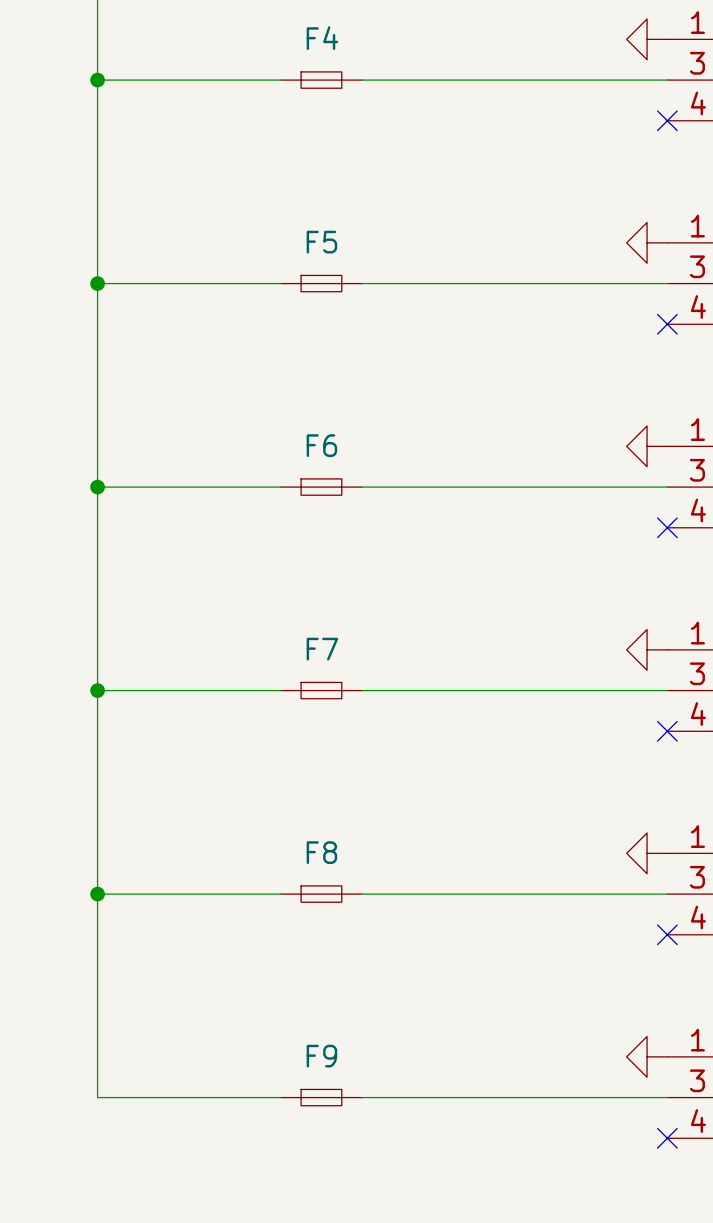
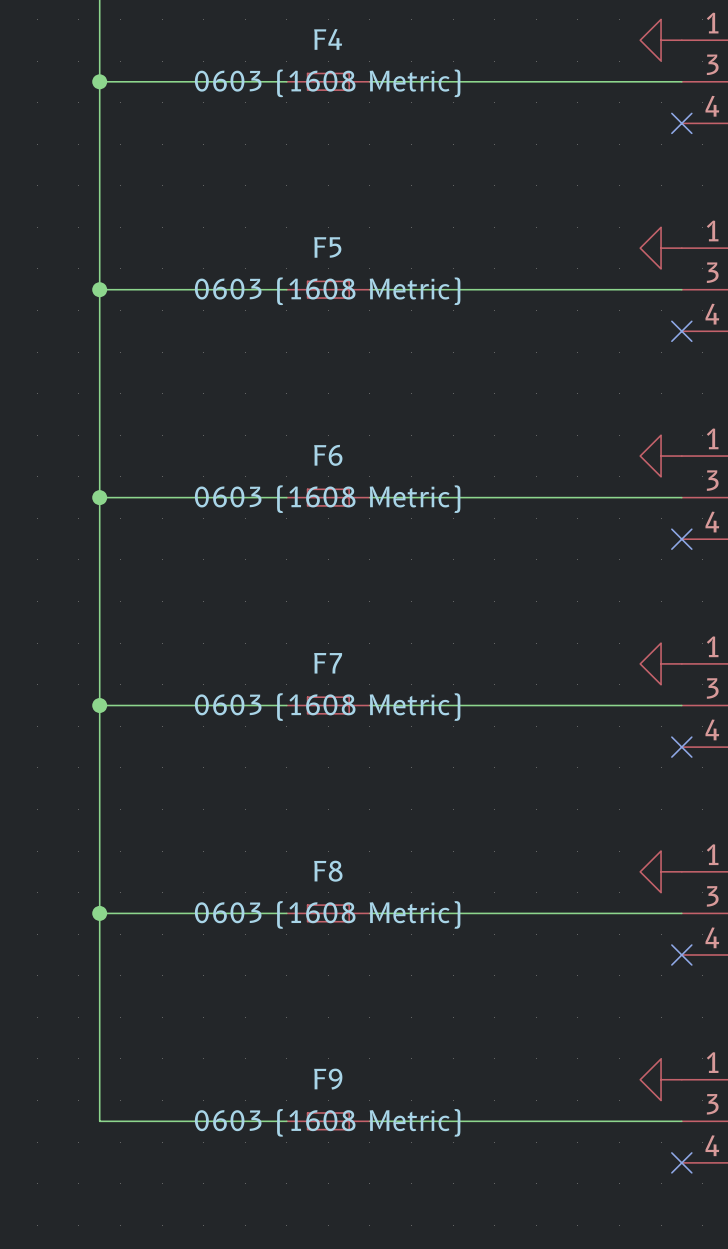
F4 text: none -> 0603 (1608 Metric) (327, 83)
F5 text: none -> 0603 (1608 Metric) (327, 291)
F6 text: none -> 0603 (1608 Metric) (327, 499)
F7 text: none -> 0603 (1608 Metric) (327, 707)
F8 text: none -> 0603 (1608 Metric) (327, 914)
F9 text: none -> 0603 (1608 Metric) (327, 1122)

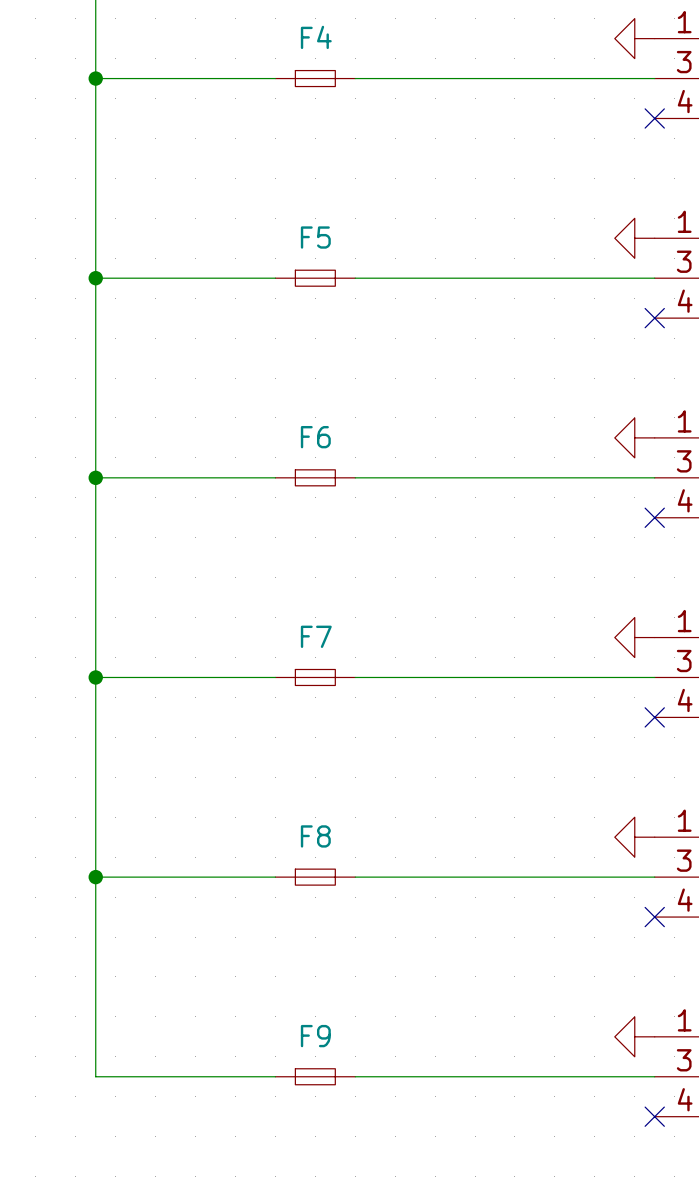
F4 text: 0603 (1608 Metric) (327, 83) -> none
F5 text: 0603 (1608 Metric) (327, 291) -> none
F6 text: 0603 (1608 Metric) (327, 499) -> none
F7 text: 0603 (1608 Metric) (327, 707) -> none
F8 text: 0603 (1608 Metric) (327, 914) -> none
F9 text: 0603 (1608 Metric) (327, 1122) -> none

